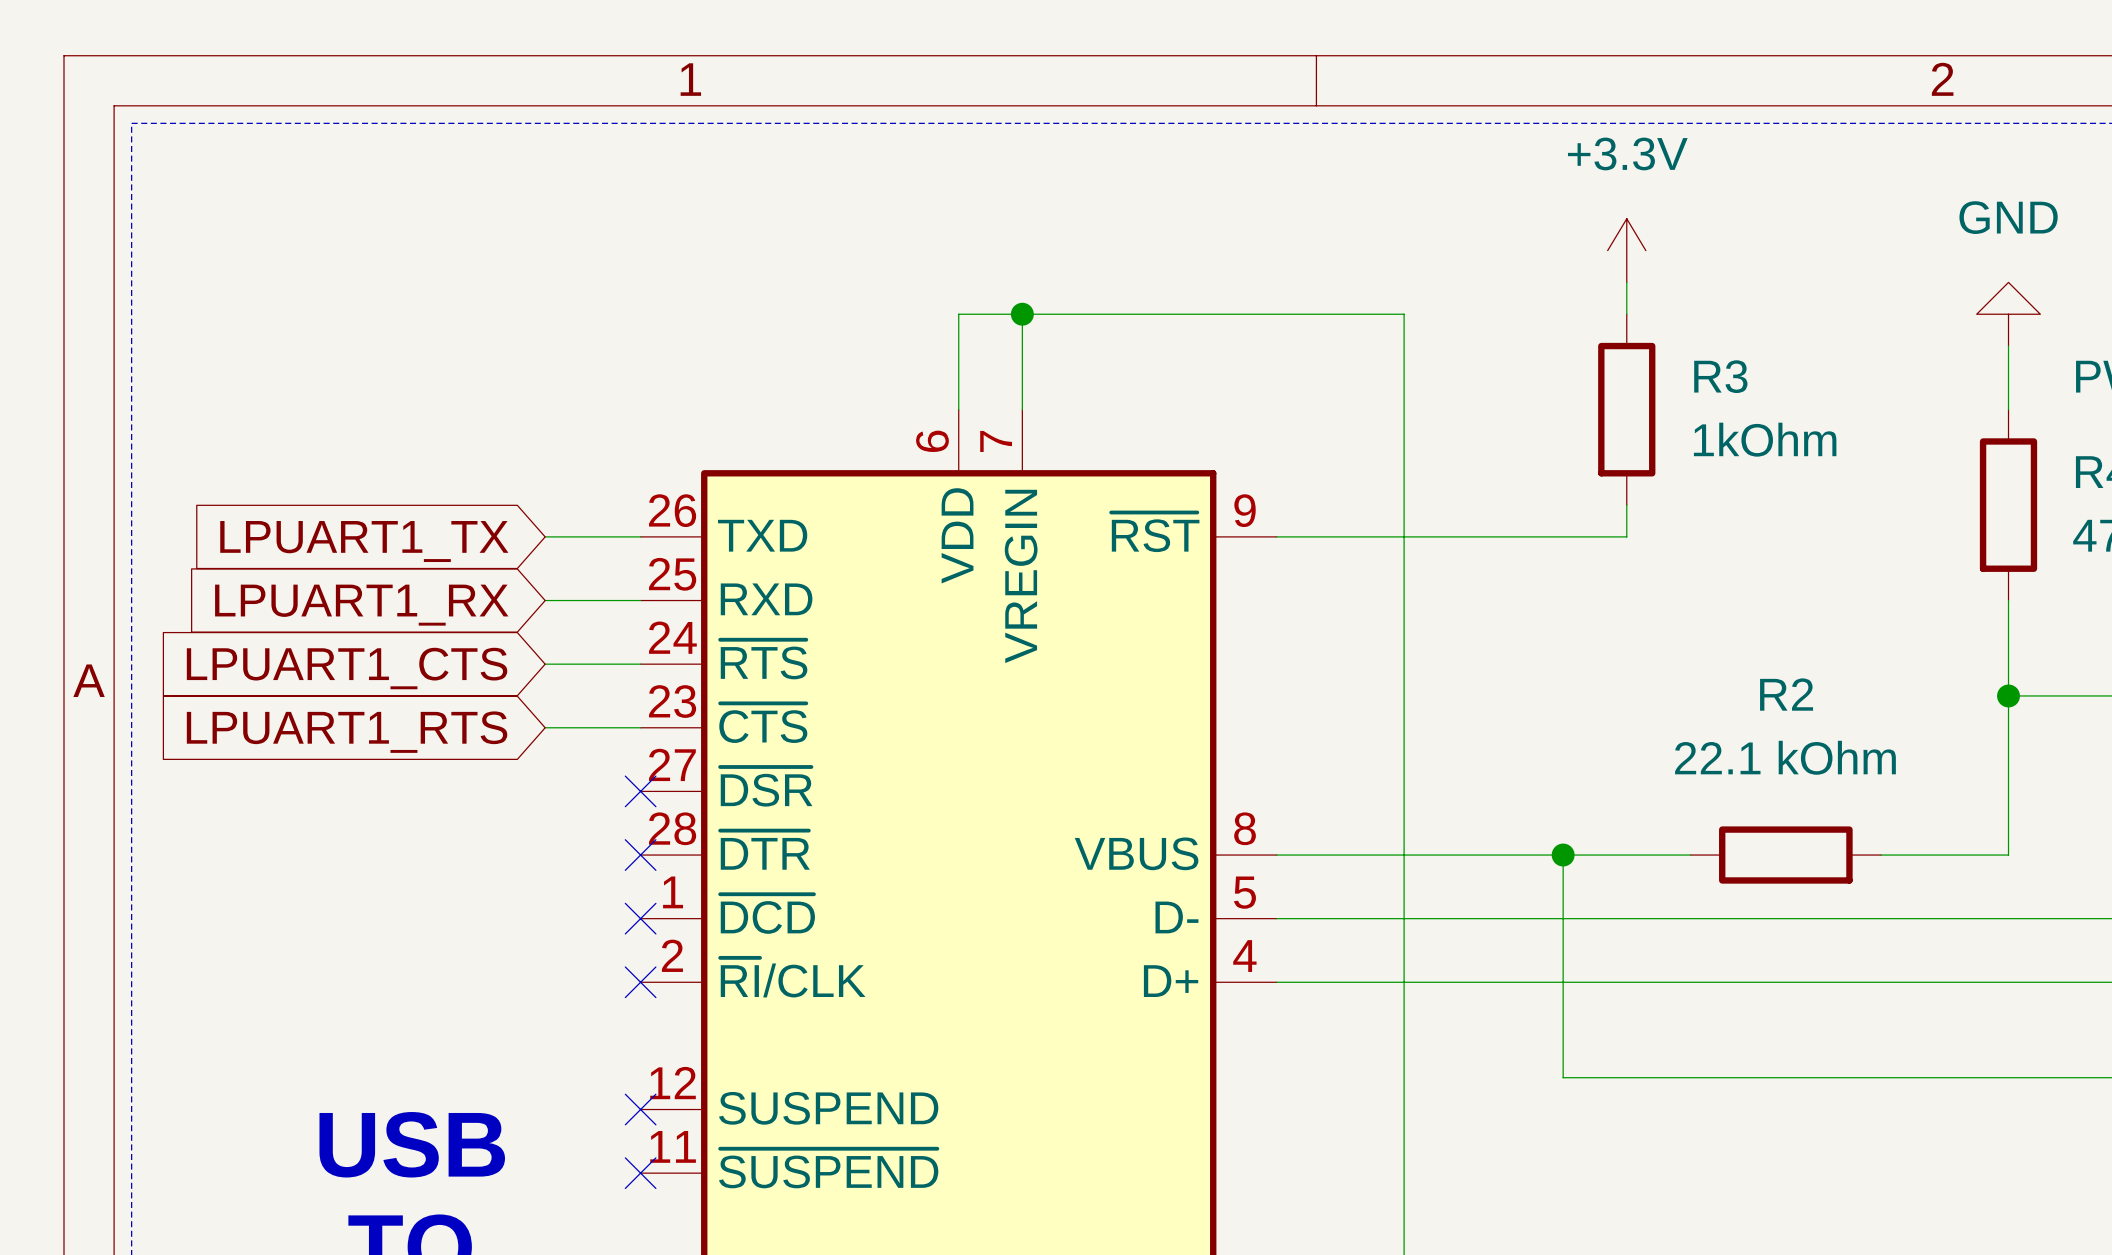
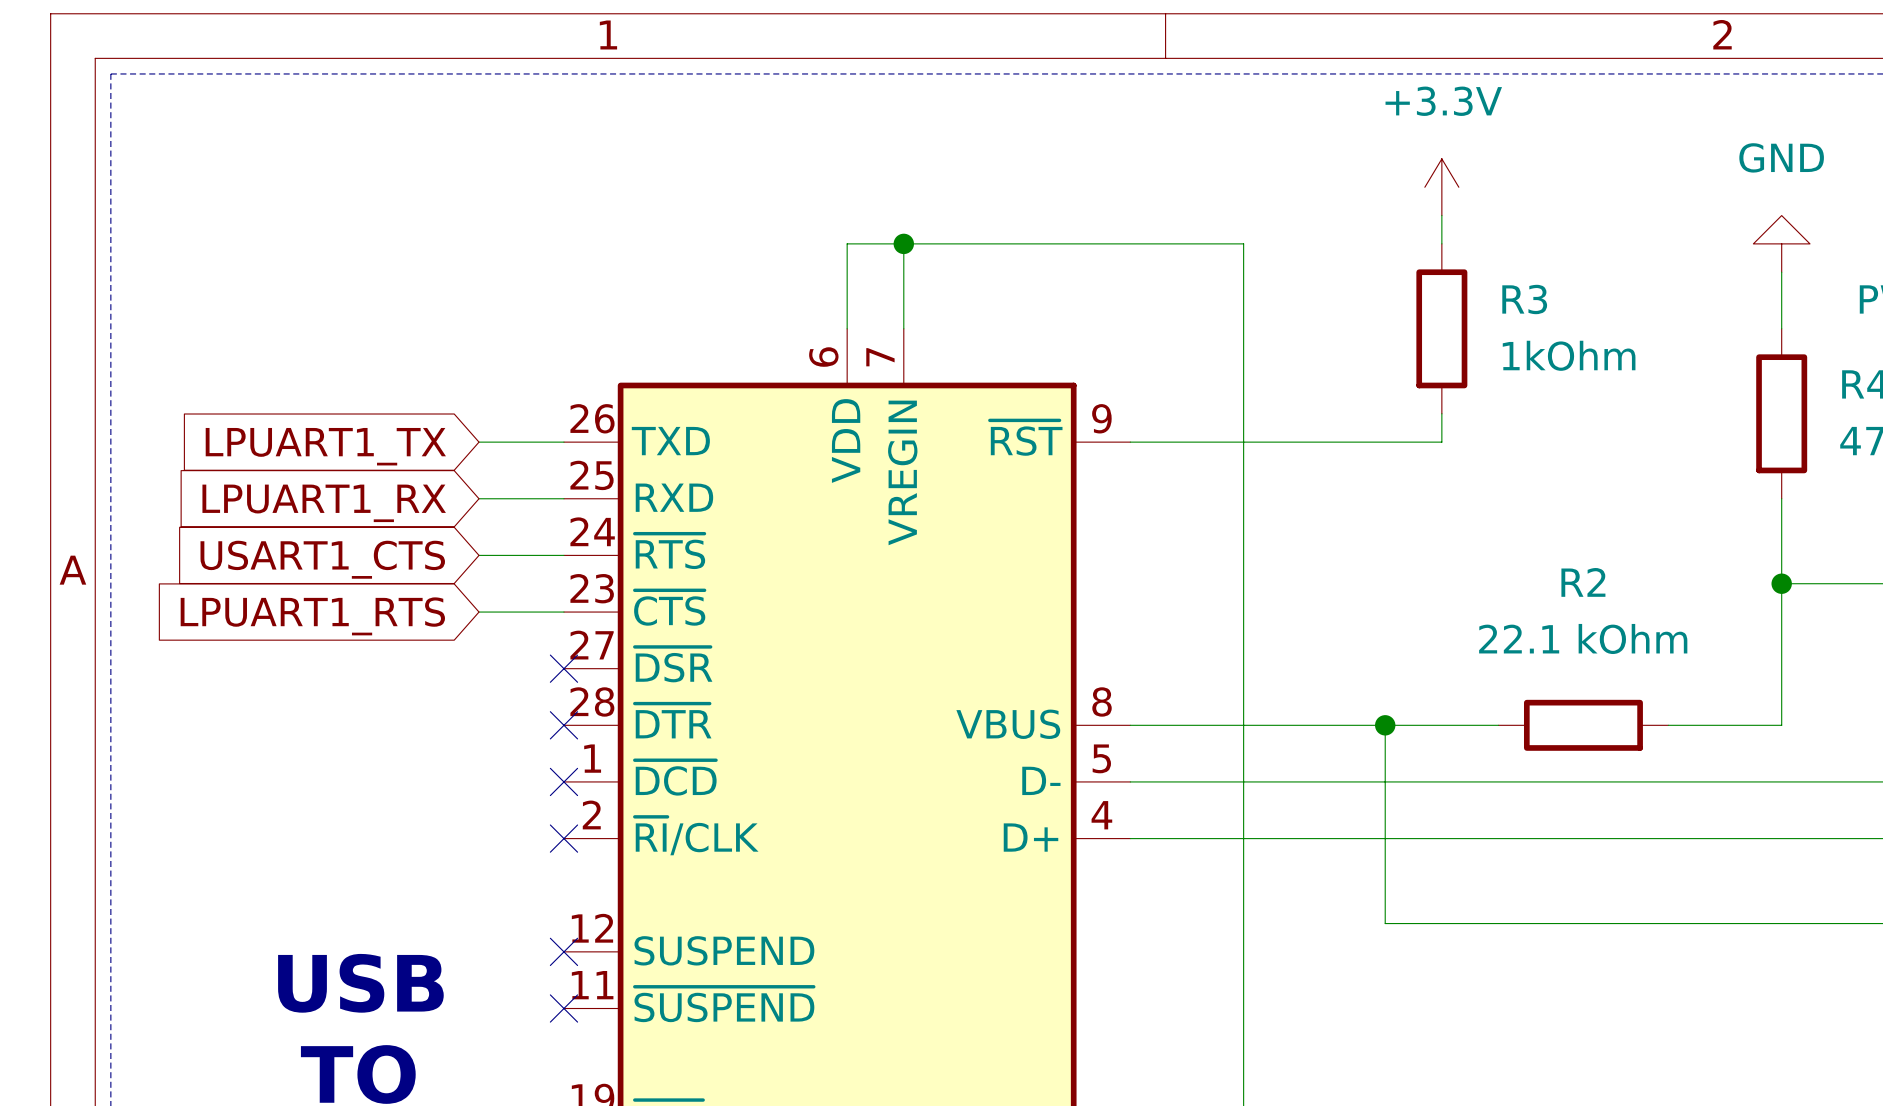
global label: LPUART1_CTS (347, 668) -> USART1_CTS (322, 559)

